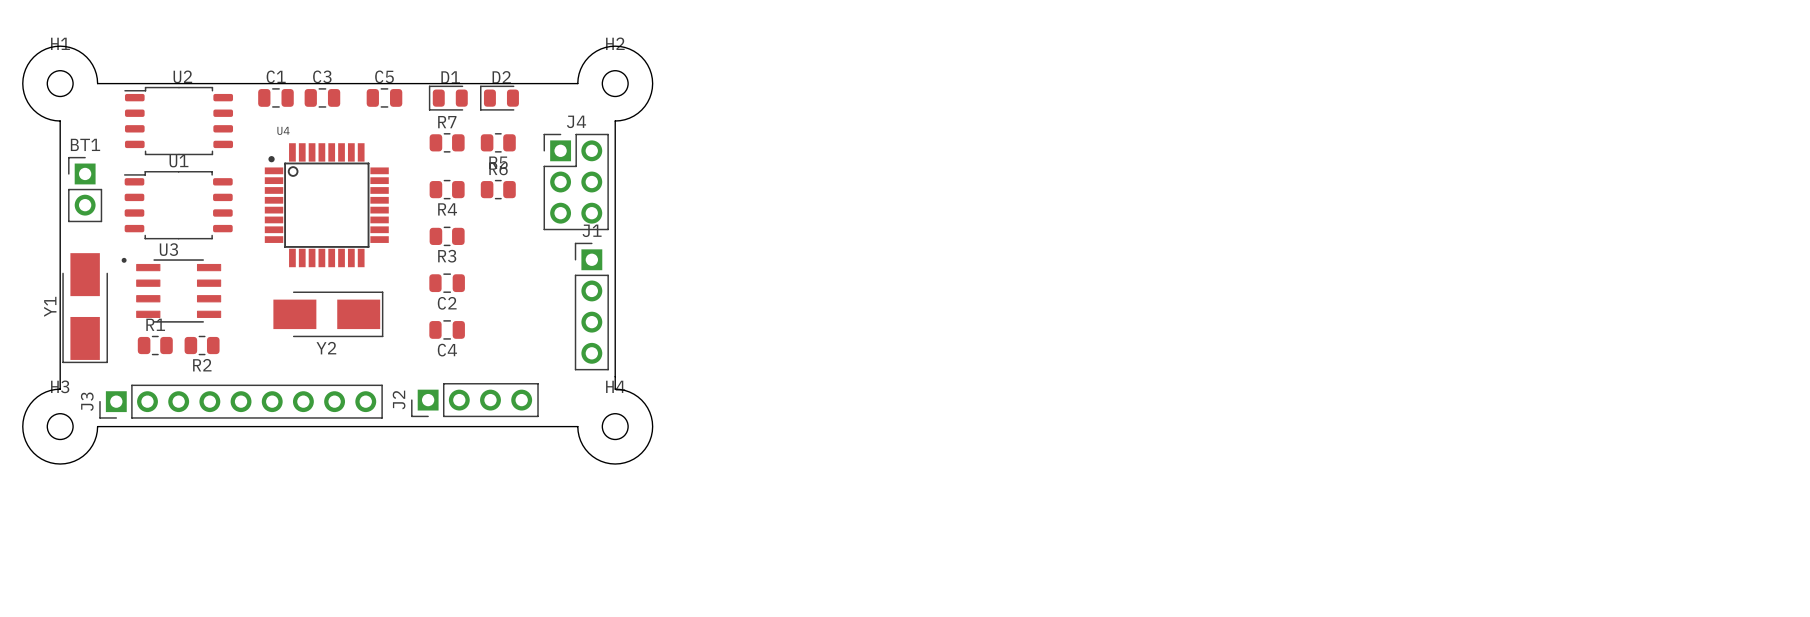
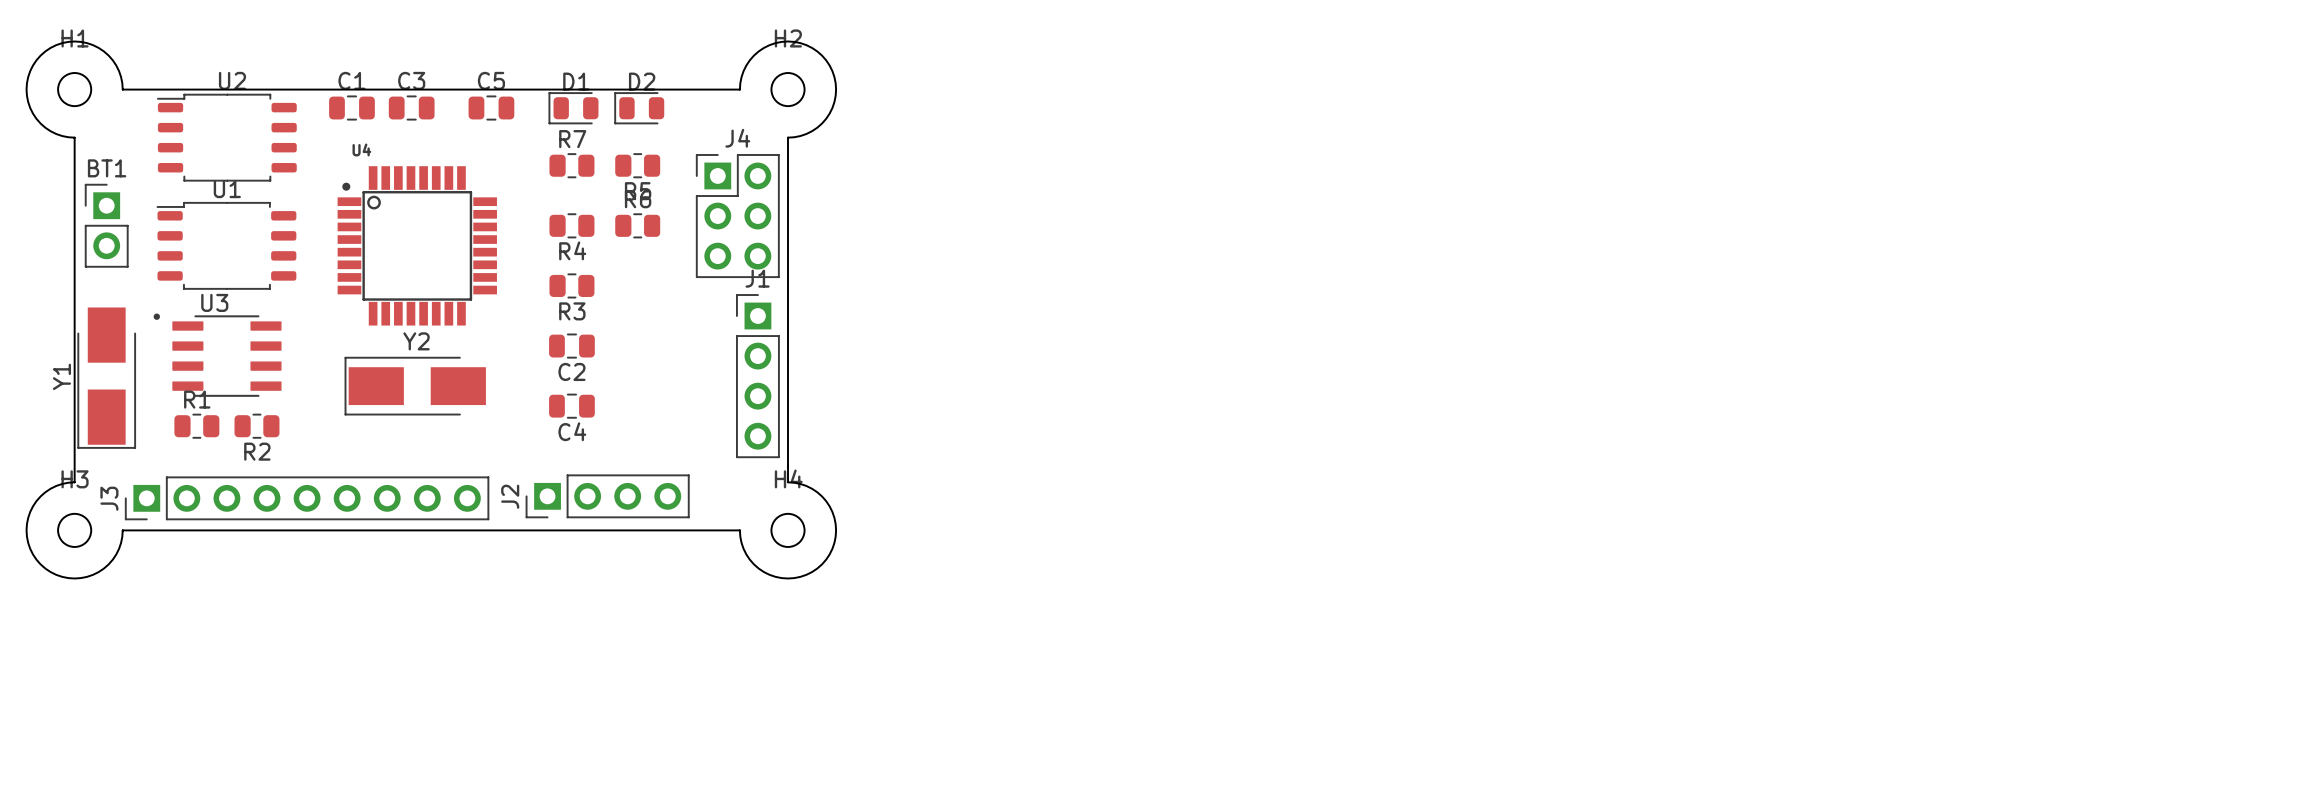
Y2 rotation: 0° (328, 314) -> 180° (415, 386)

